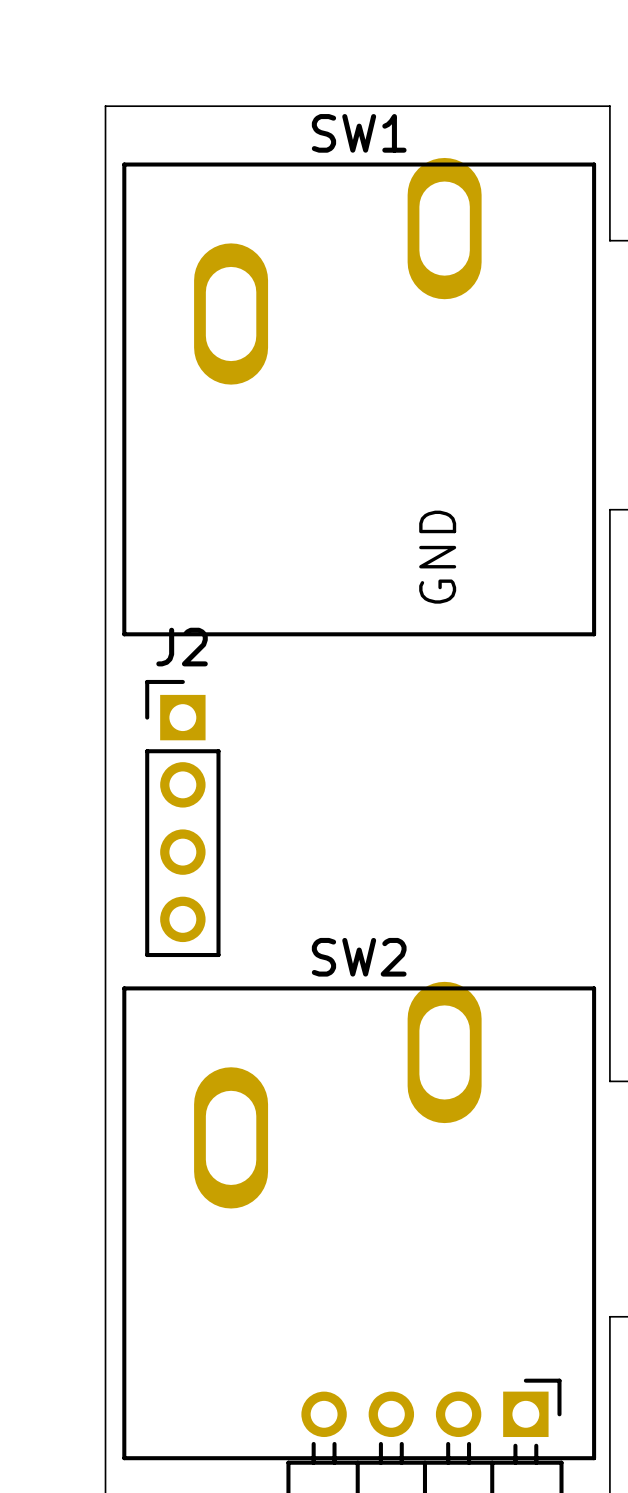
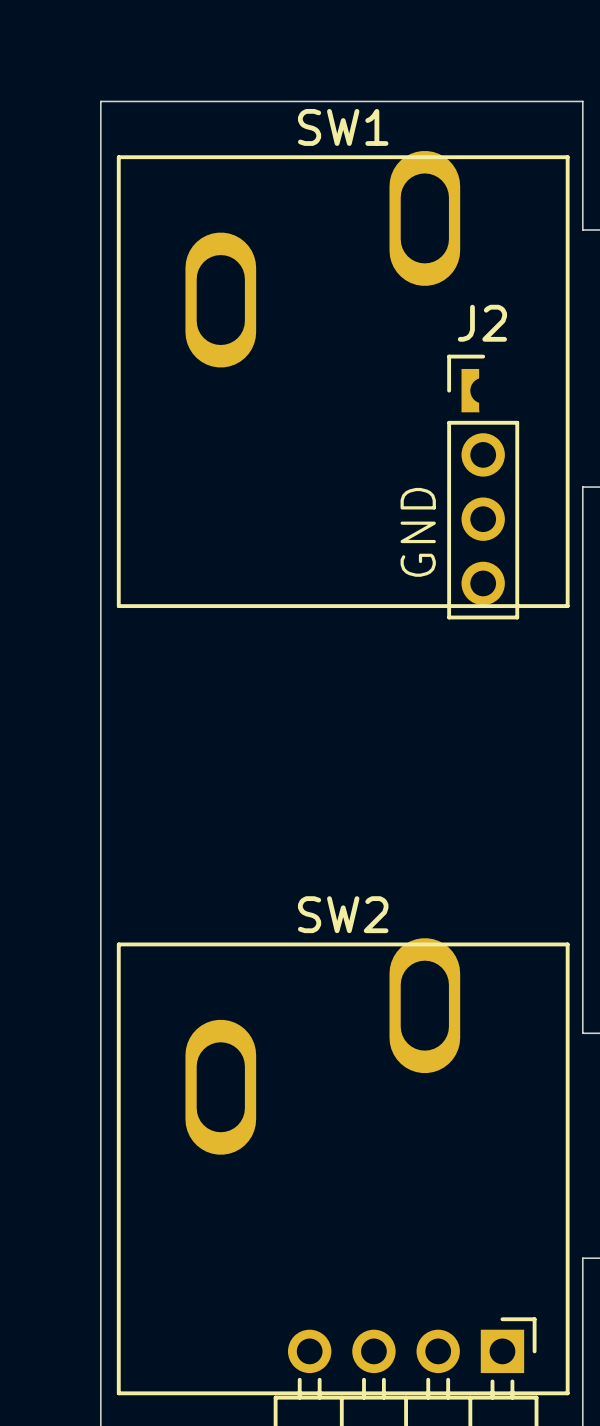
J2 position: (182, 818) -> (483, 487)

